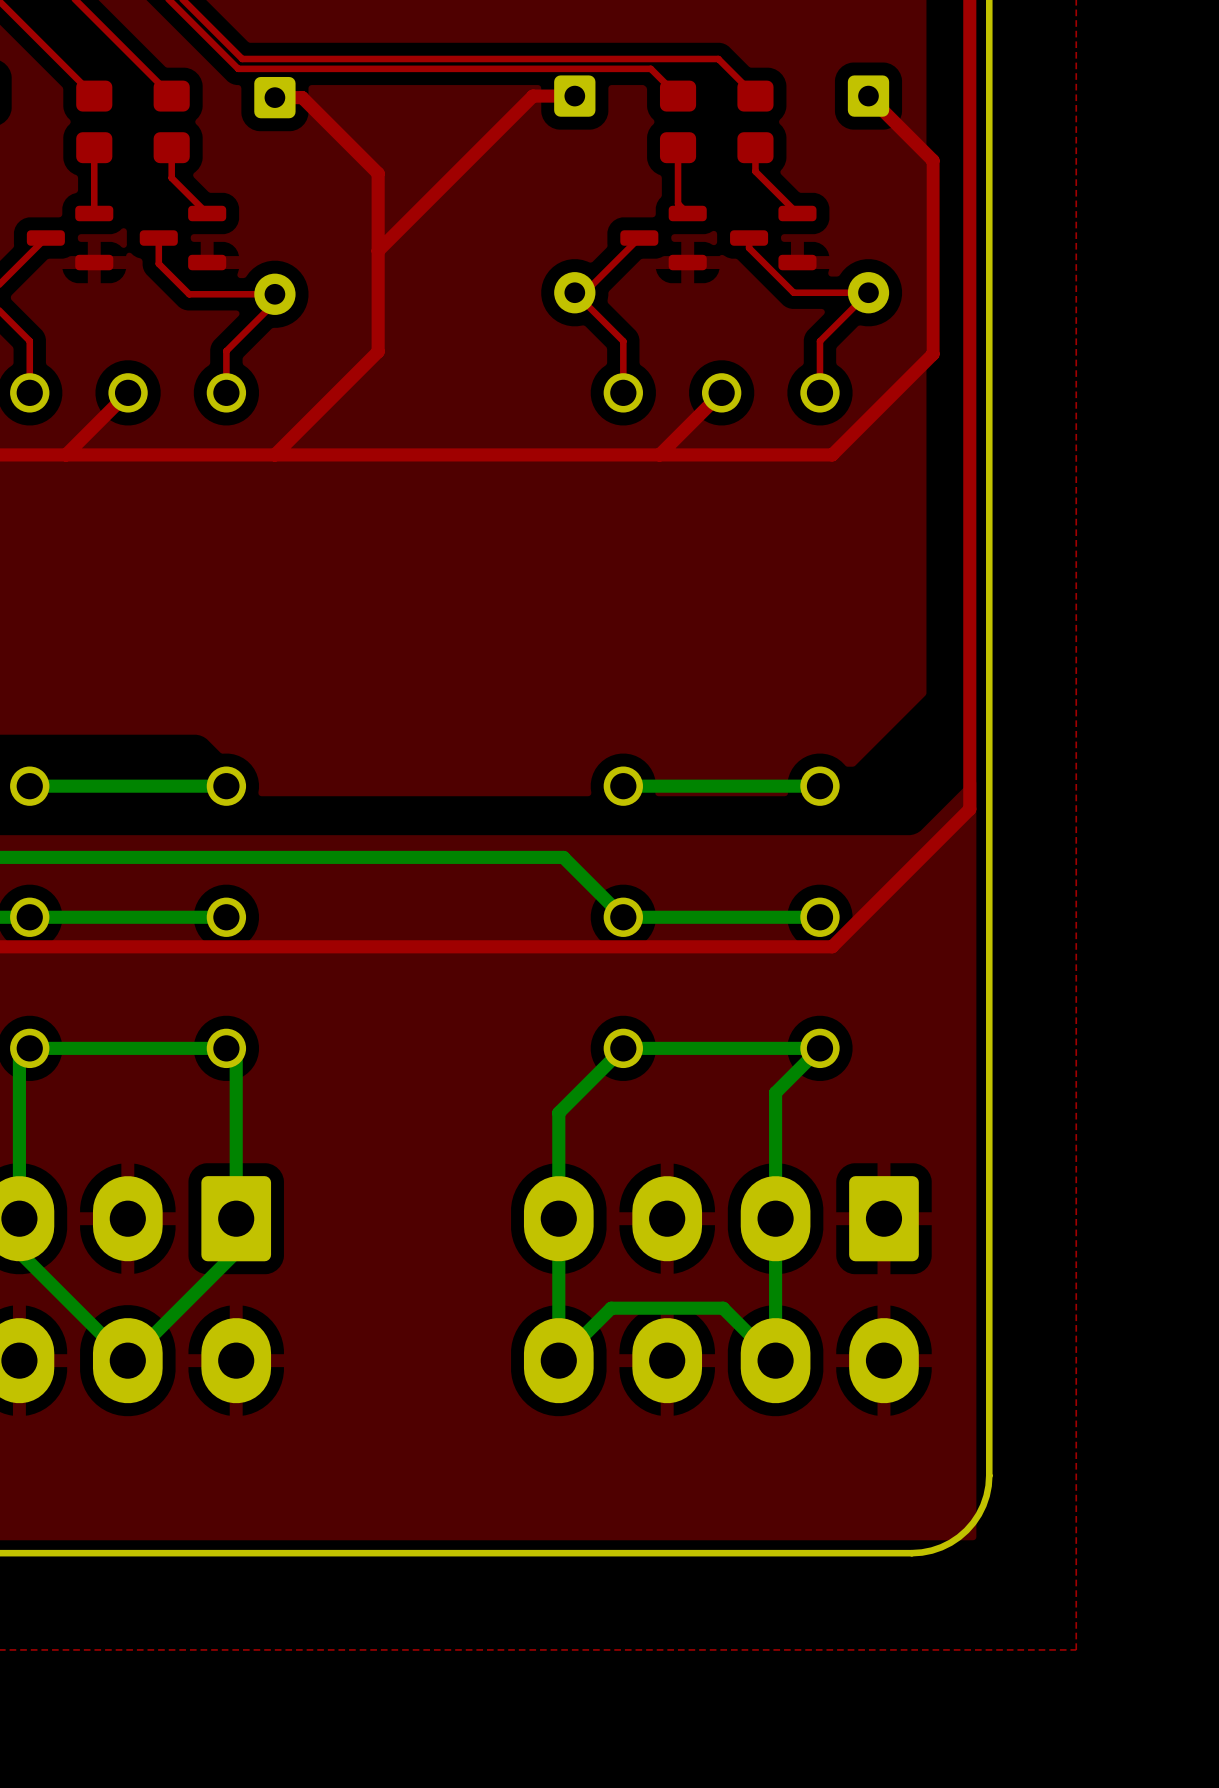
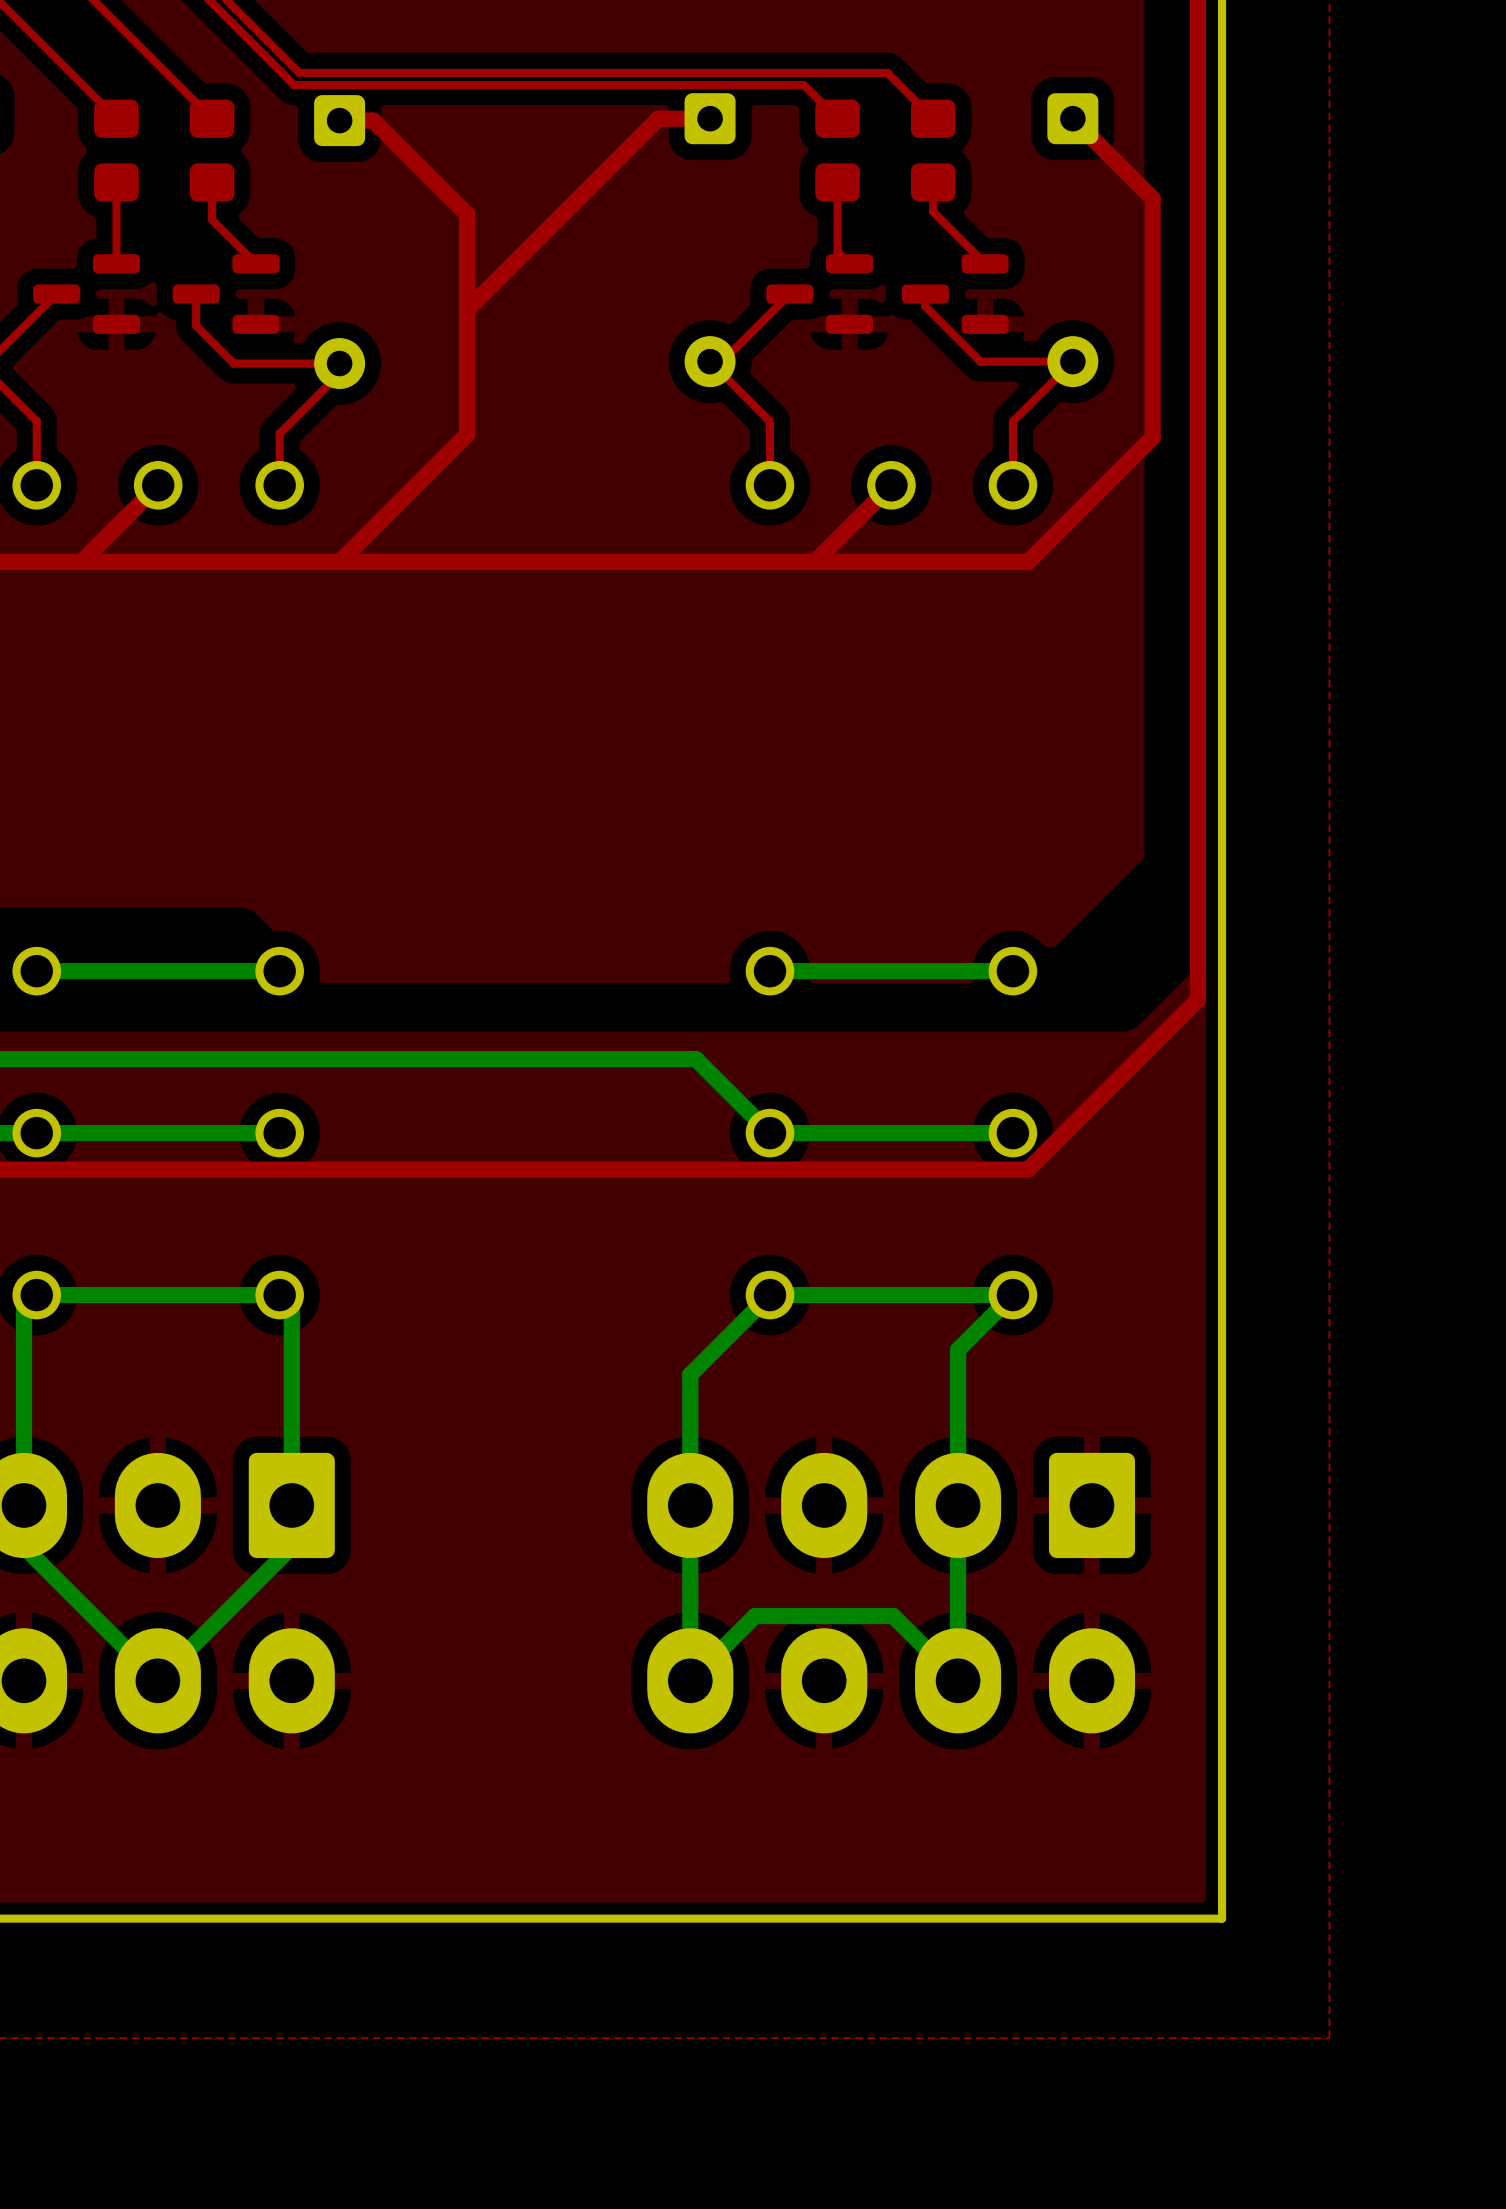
board edge: (989, 1475) (983, 1505) (966, 1530) (941, 1547) (911, 1553) -> (1222, 1822) (1222, 1918) (1126, 1918)

